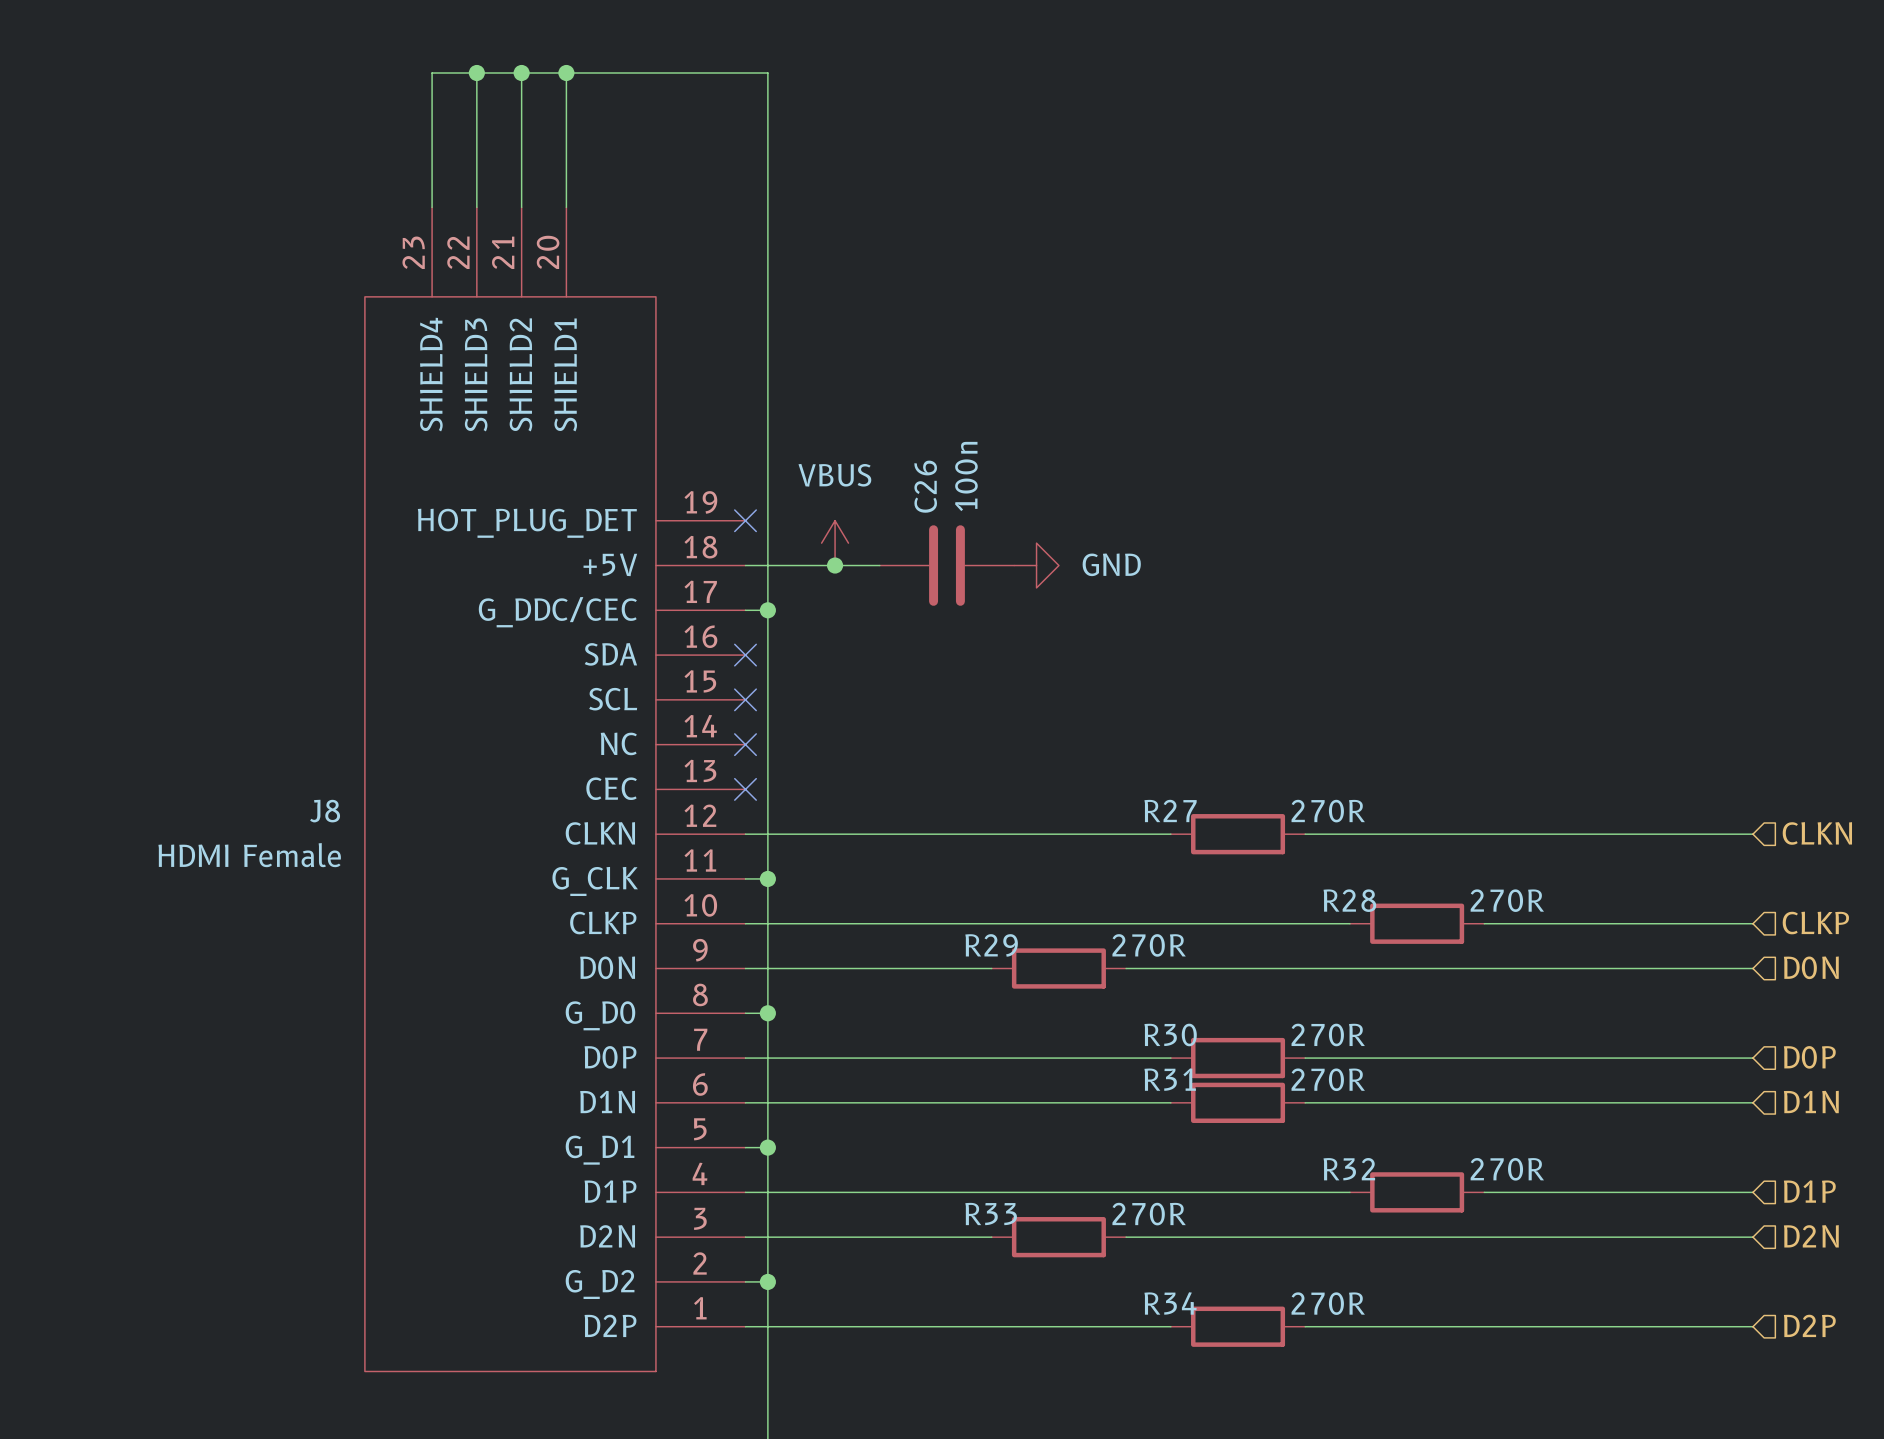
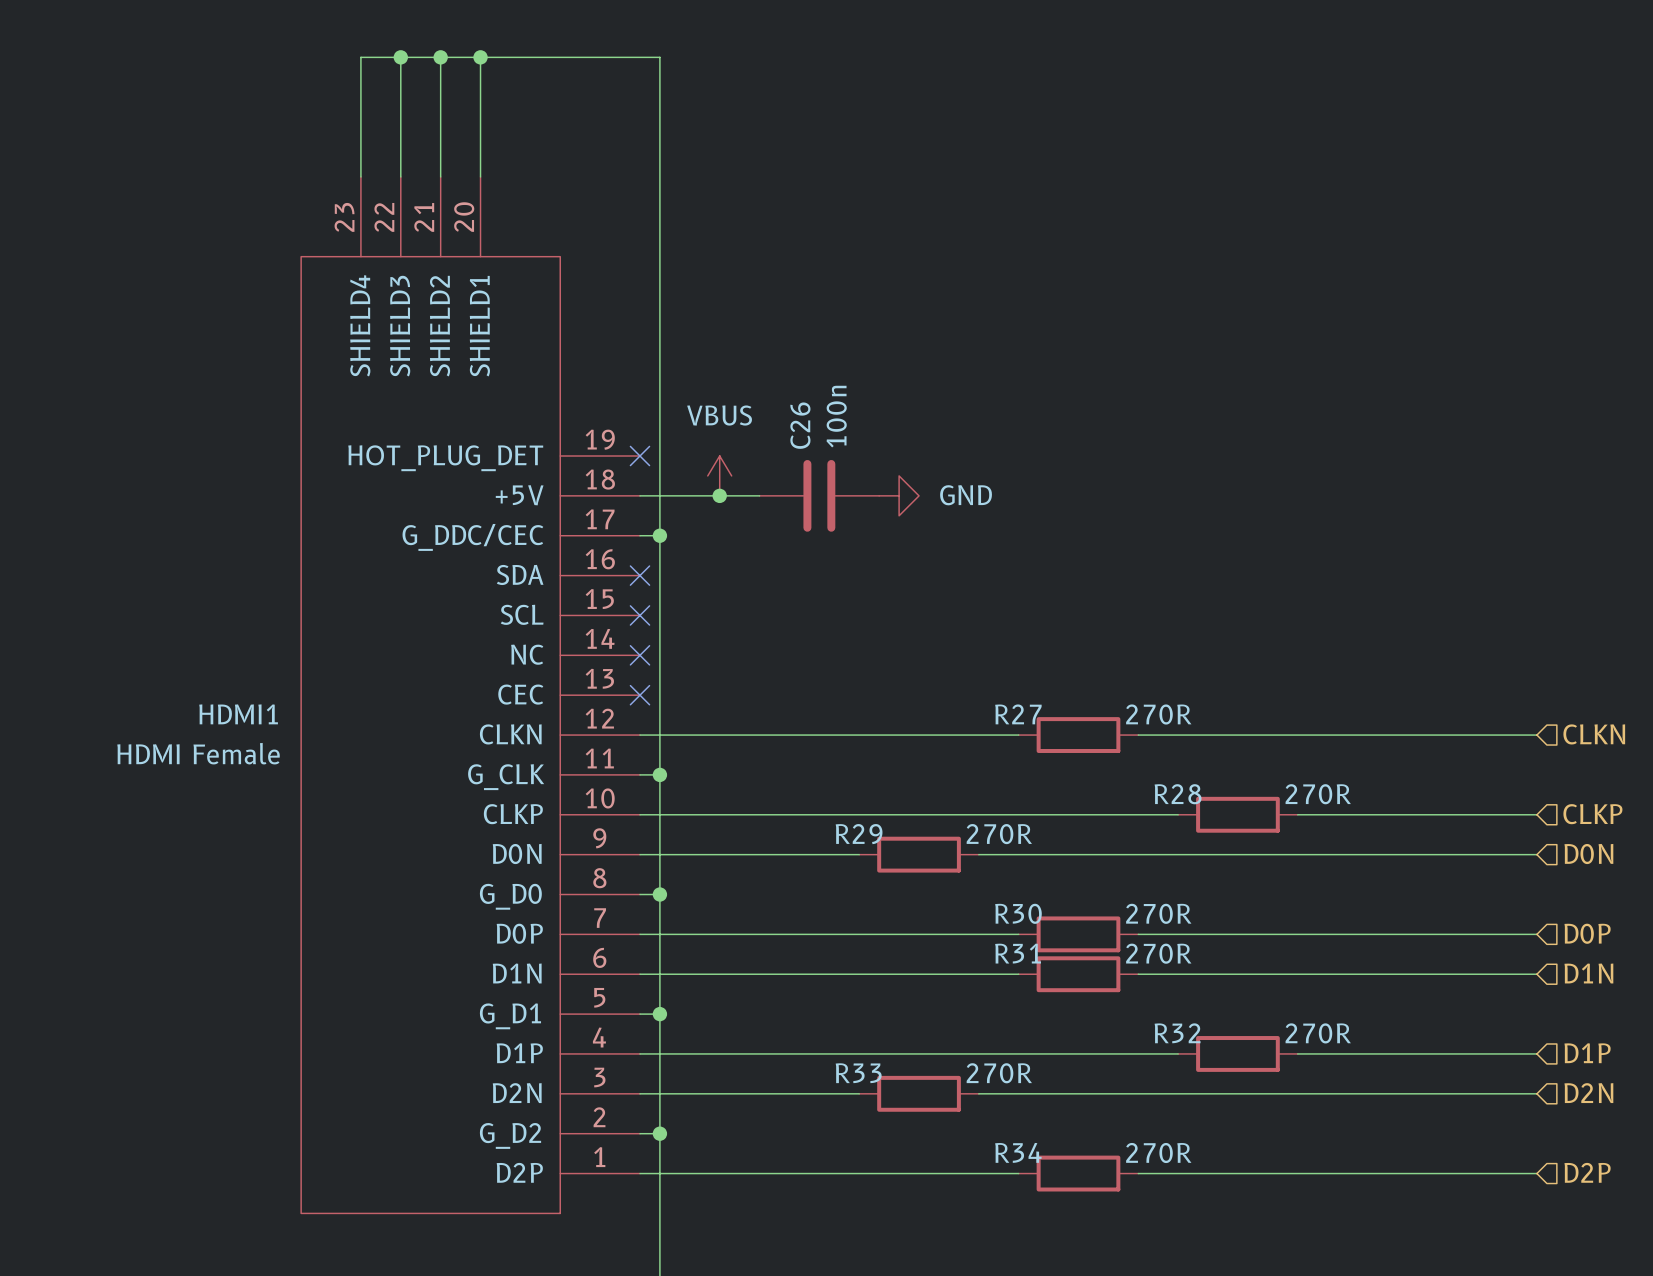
J8 name: J8 (325, 811) -> HDMI1 (238, 714)

